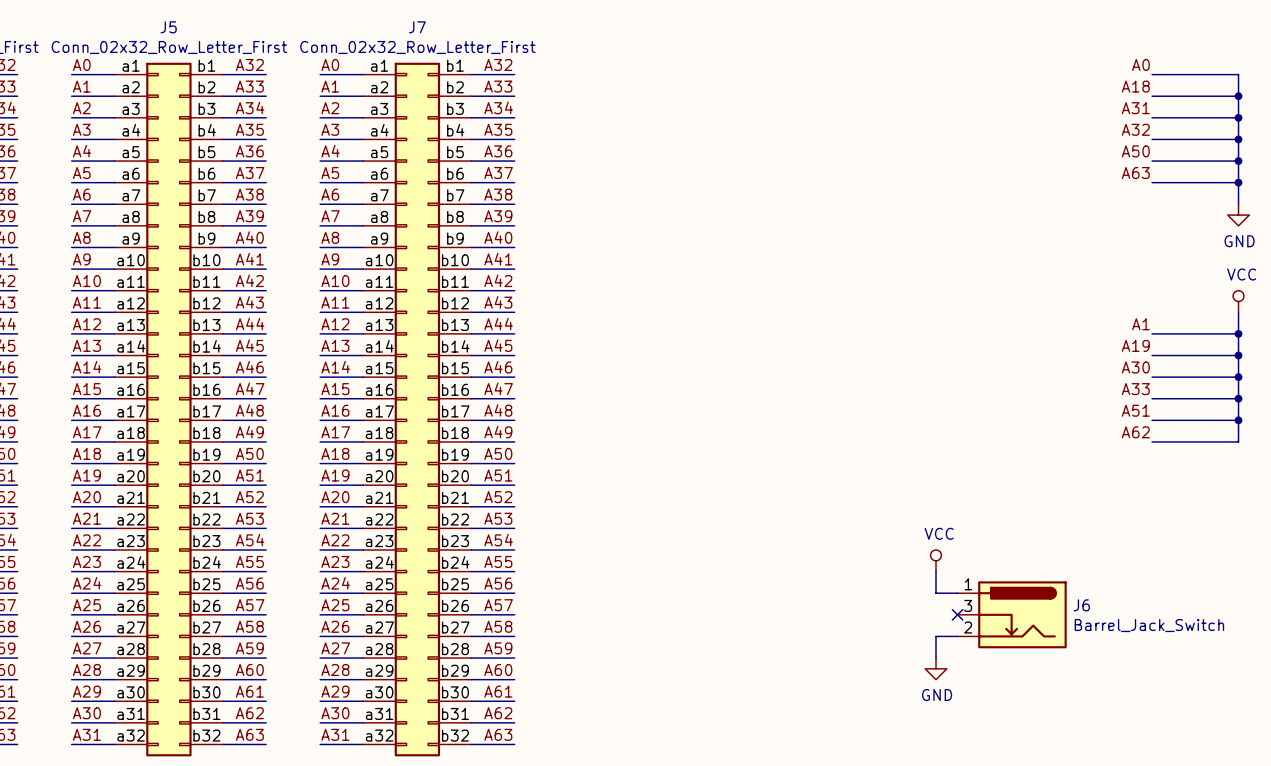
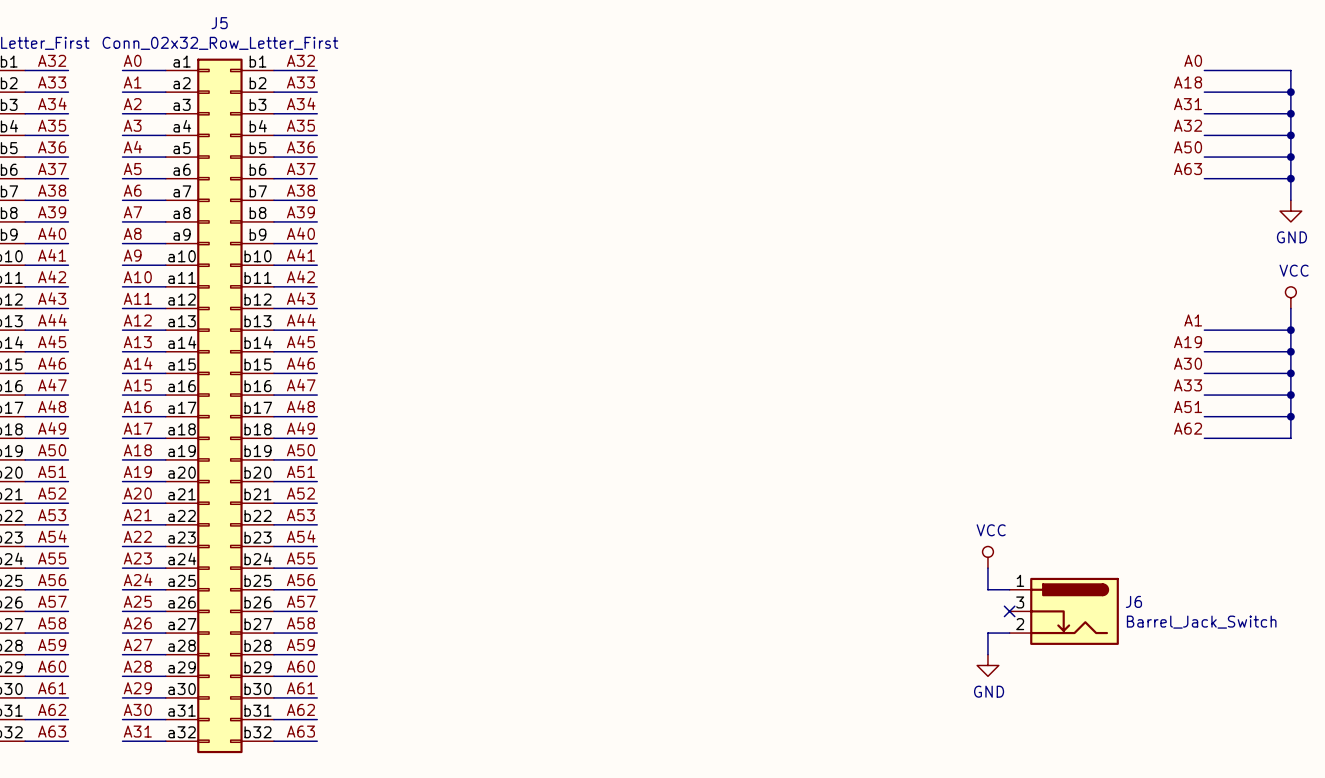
label: A0 (330, 64) -> none
label: A32 (498, 64) -> none
wire: (320, 74) (363, 74) -> none
wire: (471, 74) (514, 74) -> none
label: A1 (330, 86) -> none
label: A33 (498, 86) -> none
wire: (320, 96) (363, 96) -> none
wire: (471, 96) (514, 96) -> none
label: A34 (498, 107) -> none
label: A2 (330, 108) -> none
wire: (320, 117) (363, 117) -> none
wire: (471, 117) (514, 117) -> none
label: A3 (330, 129) -> none
label: A35 (498, 129) -> none
wire: (320, 139) (363, 139) -> none
wire: (471, 139) (514, 139) -> none
label: A4 (330, 151) -> none
label: A36 (498, 151) -> none
wire: (320, 161) (363, 161) -> none
wire: (471, 161) (514, 161) -> none
label: A5 (330, 173) -> none
label: A37 (498, 173) -> none
wire: (320, 182) (363, 182) -> none
wire: (471, 182) (514, 182) -> none
label: A6 (330, 194) -> none
label: A38 (498, 194) -> none
wire: (320, 204) (363, 204) -> none
wire: (471, 204) (514, 204) -> none
label: A7 (330, 216) -> none
label: A39 (498, 216) -> none
wire: (320, 225) (363, 225) -> none
wire: (471, 225) (514, 225) -> none
label: A8 (330, 237) -> none
label: A40 (498, 237) -> none
wire: (320, 247) (363, 247) -> none
wire: (471, 247) (514, 247) -> none
label: A9 (330, 259) -> none
label: A41 (498, 259) -> none
wire: (320, 269) (363, 269) -> none
wire: (471, 269) (514, 269) -> none
label: A42 (498, 280) -> none
label: A10 (335, 281) -> none
wire: (320, 290) (363, 290) -> none
wire: (471, 290) (514, 290) -> none
label: A11 (335, 302) -> none
label: A43 (498, 302) -> none
wire: (320, 312) (363, 312) -> none
wire: (471, 312) (514, 312) -> none
label: A12 (335, 324) -> none
label: A44 (498, 324) -> none
wire: (320, 333) (363, 333) -> none
wire: (471, 333) (514, 333) -> none
label: A13 (335, 345) -> none
label: A45 (498, 345) -> none
wire: (320, 355) (363, 355) -> none
wire: (471, 355) (514, 355) -> none
label: A14 (335, 367) -> none
label: A46 (498, 367) -> none
wire: (320, 377) (363, 377) -> none
wire: (471, 377) (514, 377) -> none
label: A47 (498, 388) -> none
label: A15 (335, 389) -> none
wire: (320, 398) (363, 398) -> none
wire: (471, 398) (514, 398) -> none
J7: Conn_02x32_Row_Letter_First (417, 409) -> none
label: A16 (335, 410) -> none
label: A48 (498, 410) -> none
wire: (320, 420) (363, 420) -> none
wire: (471, 420) (514, 420) -> none
label: A17 (335, 432) -> none
label: A49 (498, 432) -> none
wire: (320, 441) (363, 441) -> none
wire: (471, 441) (514, 441) -> none
label: A18 (335, 453) -> none
label: A50 (498, 453) -> none
wire: (320, 463) (363, 463) -> none
wire: (471, 463) (514, 463) -> none
label: A19 (335, 475) -> none
label: A51 (498, 475) -> none
wire: (320, 485) (363, 485) -> none
wire: (471, 485) (514, 485) -> none
label: A20 (335, 497) -> none
label: A52 (498, 497) -> none
wire: (320, 506) (363, 506) -> none
wire: (471, 506) (514, 506) -> none
label: A21 (335, 518) -> none
label: A53 (498, 518) -> none
wire: (320, 528) (363, 528) -> none
wire: (471, 528) (514, 528) -> none
label: A22 (335, 540) -> none
label: A54 (498, 540) -> none
wire: (320, 550) (363, 550) -> none
wire: (471, 550) (514, 550) -> none
label: A23 (335, 561) -> none
label: A55 (498, 561) -> none
wire: (320, 571) (363, 571) -> none
wire: (471, 571) (514, 571) -> none
label: A24 (335, 583) -> none
label: A56 (498, 583) -> none
wire: (320, 593) (363, 593) -> none
wire: (471, 593) (514, 593) -> none
label: A25 (335, 605) -> none
label: A57 (498, 605) -> none
wire: (320, 614) (363, 614) -> none
wire: (471, 614) (514, 614) -> none
label: A26 (335, 626) -> none
label: A58 (498, 626) -> none
wire: (320, 636) (363, 636) -> none
wire: (471, 636) (514, 636) -> none
label: A27 (335, 648) -> none
label: A59 (498, 648) -> none
wire: (320, 658) (363, 658) -> none
wire: (471, 658) (514, 658) -> none
label: A28 (335, 670) -> none
label: A60 (498, 670) -> none
wire: (320, 679) (363, 679) -> none
wire: (471, 679) (514, 679) -> none
label: A29 (335, 691) -> none
label: A61 (498, 691) -> none
wire: (320, 701) (363, 701) -> none
wire: (471, 701) (514, 701) -> none
label: A30 (335, 713) -> none
label: A62 (498, 713) -> none
wire: (320, 722) (363, 722) -> none
wire: (471, 722) (514, 722) -> none
label: A31 (335, 734) -> none
label: A63 (498, 734) -> none
wire: (320, 744) (363, 744) -> none
wire: (471, 744) (514, 744) -> none

